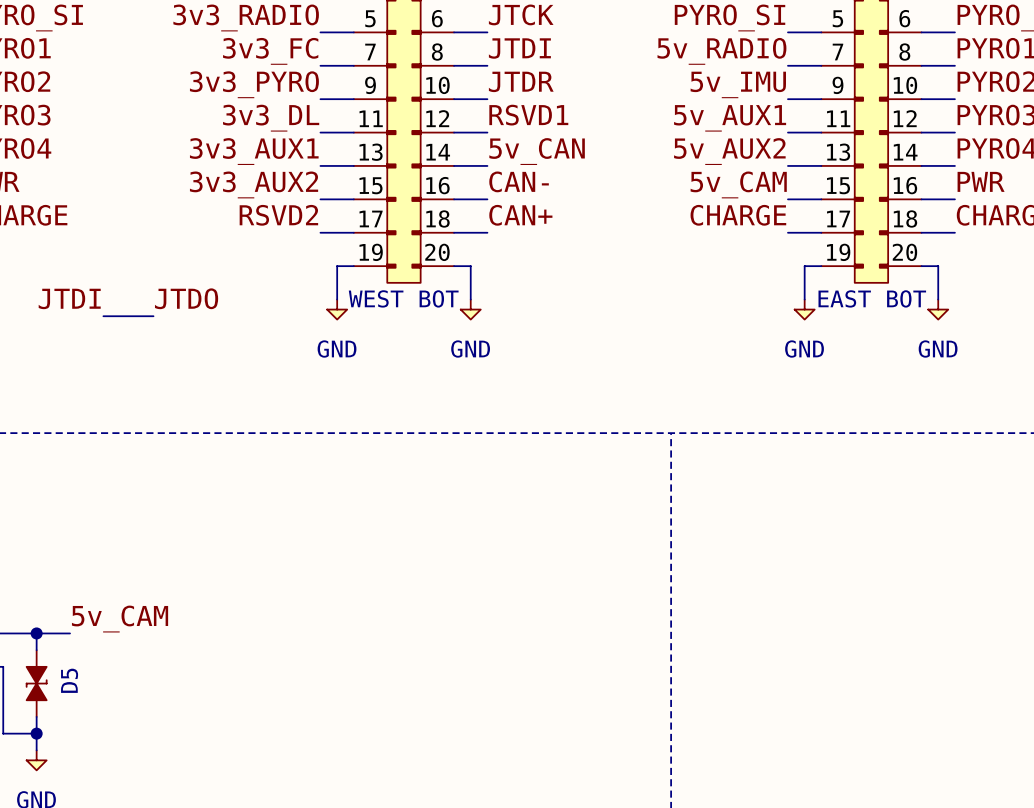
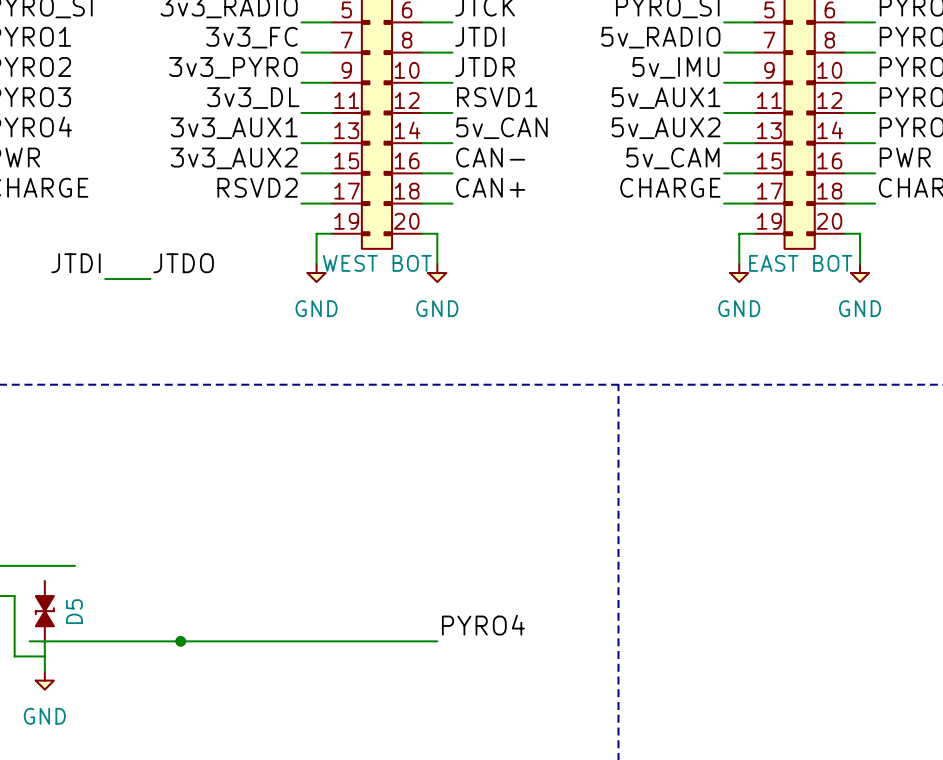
label: 5v_CAM (120, 619) -> none
wire: (36, 633) (36, 650) -> none
junction: (36, 633) -> none
label: none -> PYRO4 (483, 625)
wire: none -> (29, 641) (437, 641)
junction: none -> (180, 641)
junction: (36, 733) -> none

